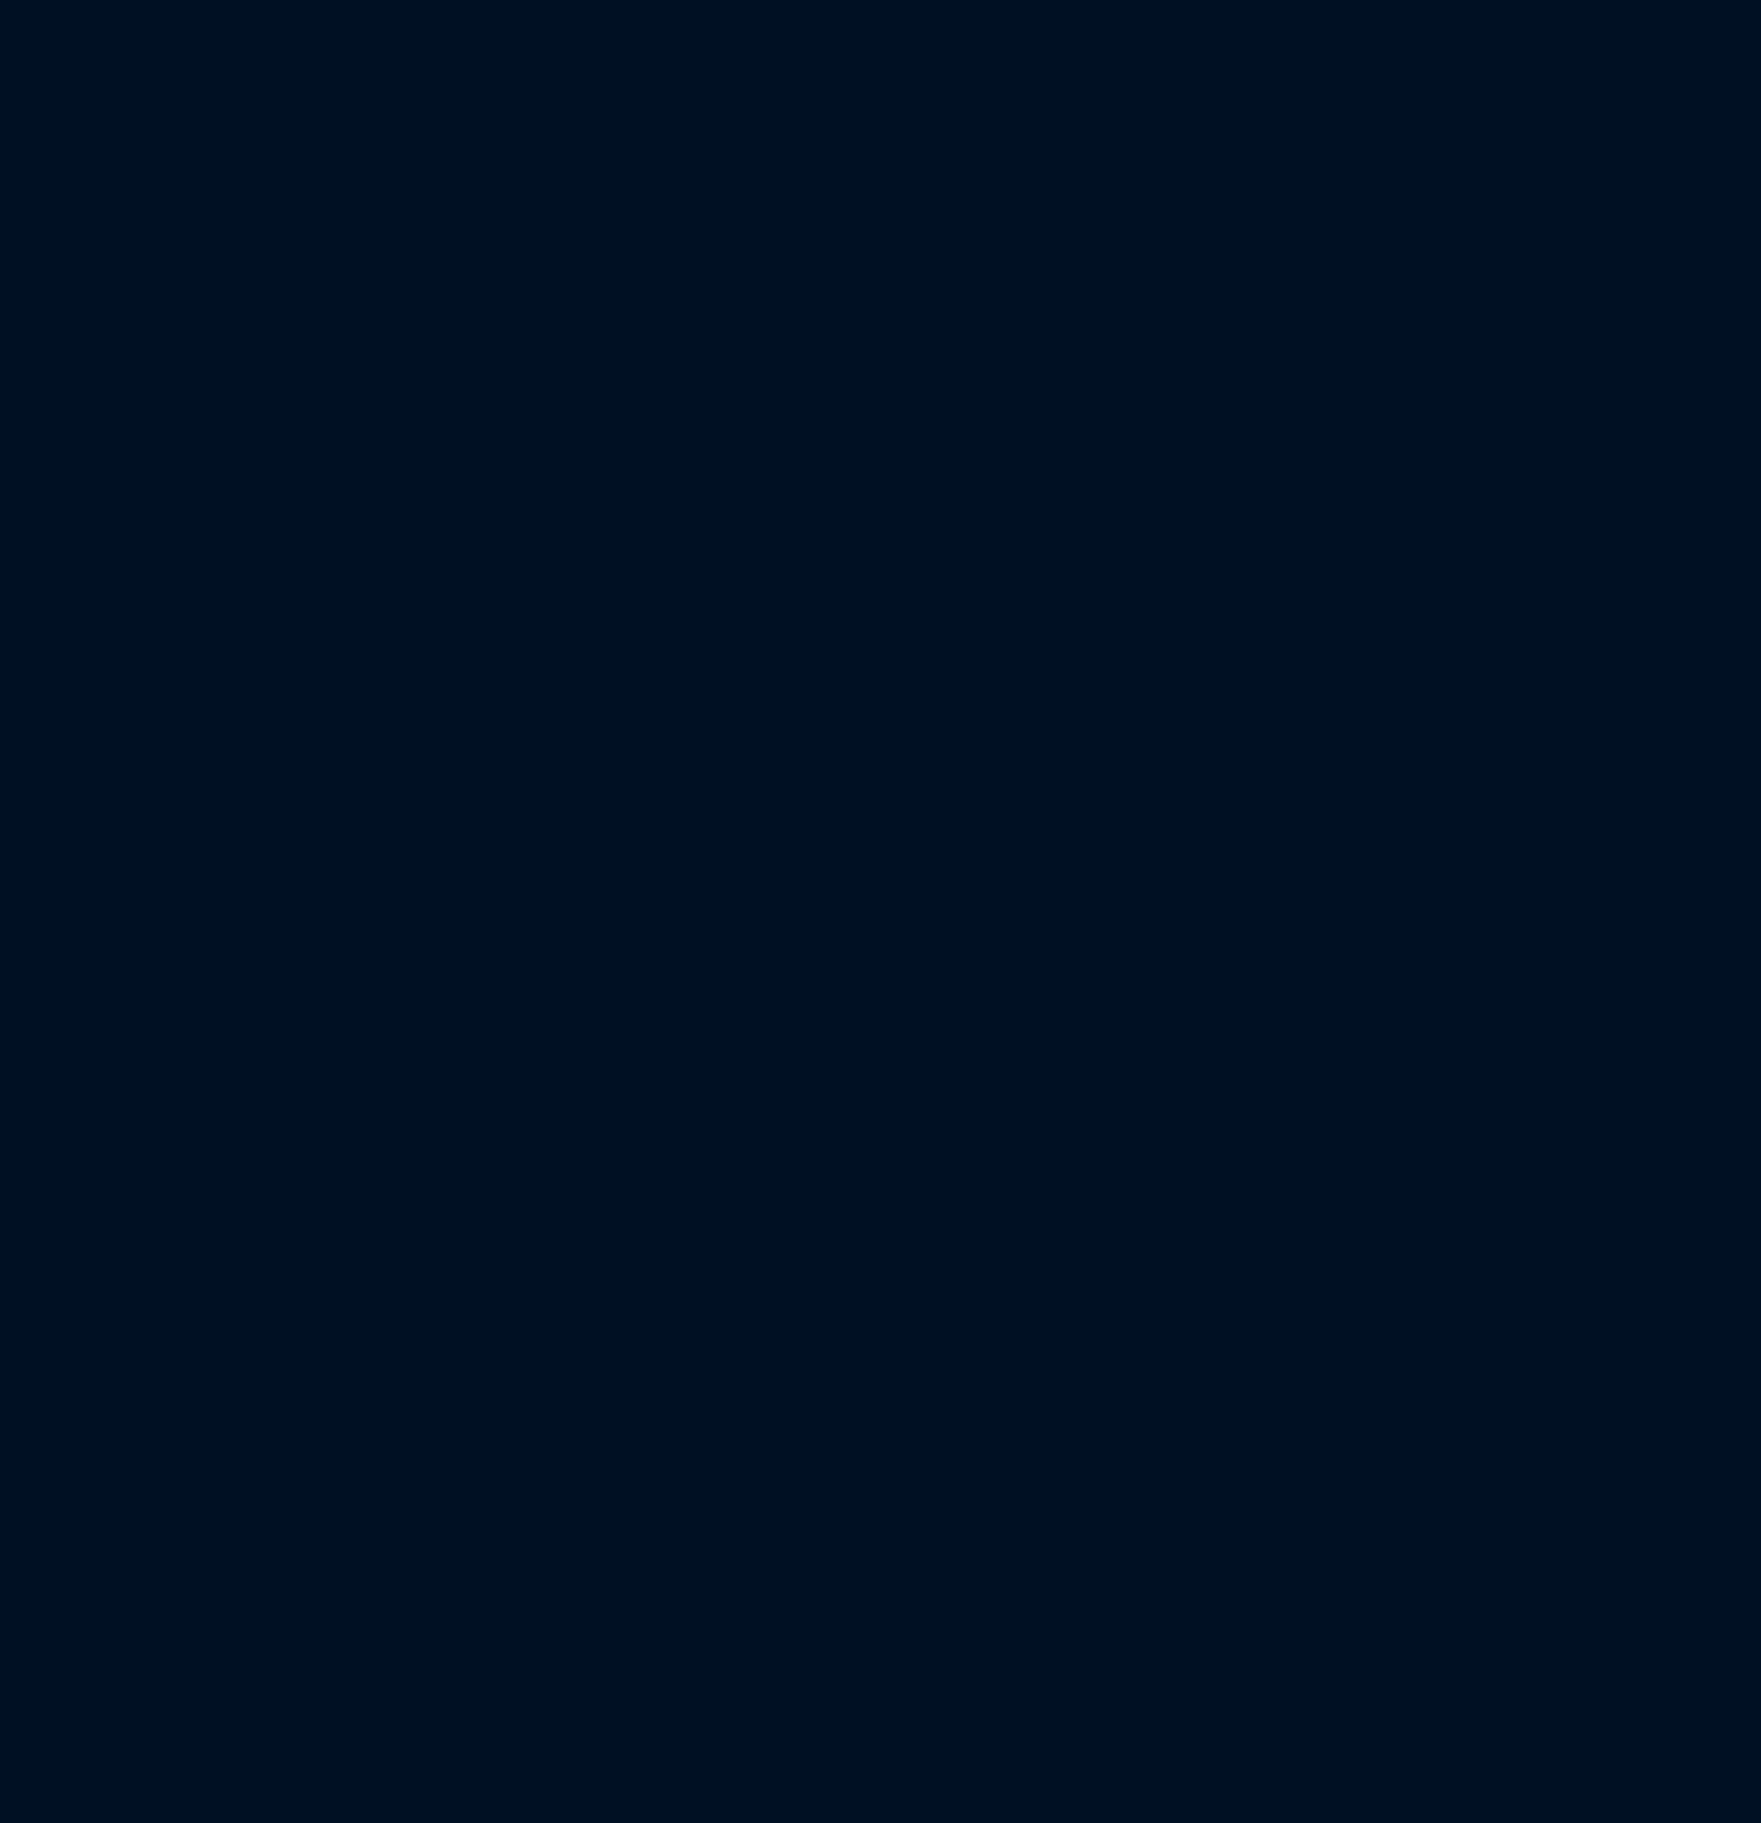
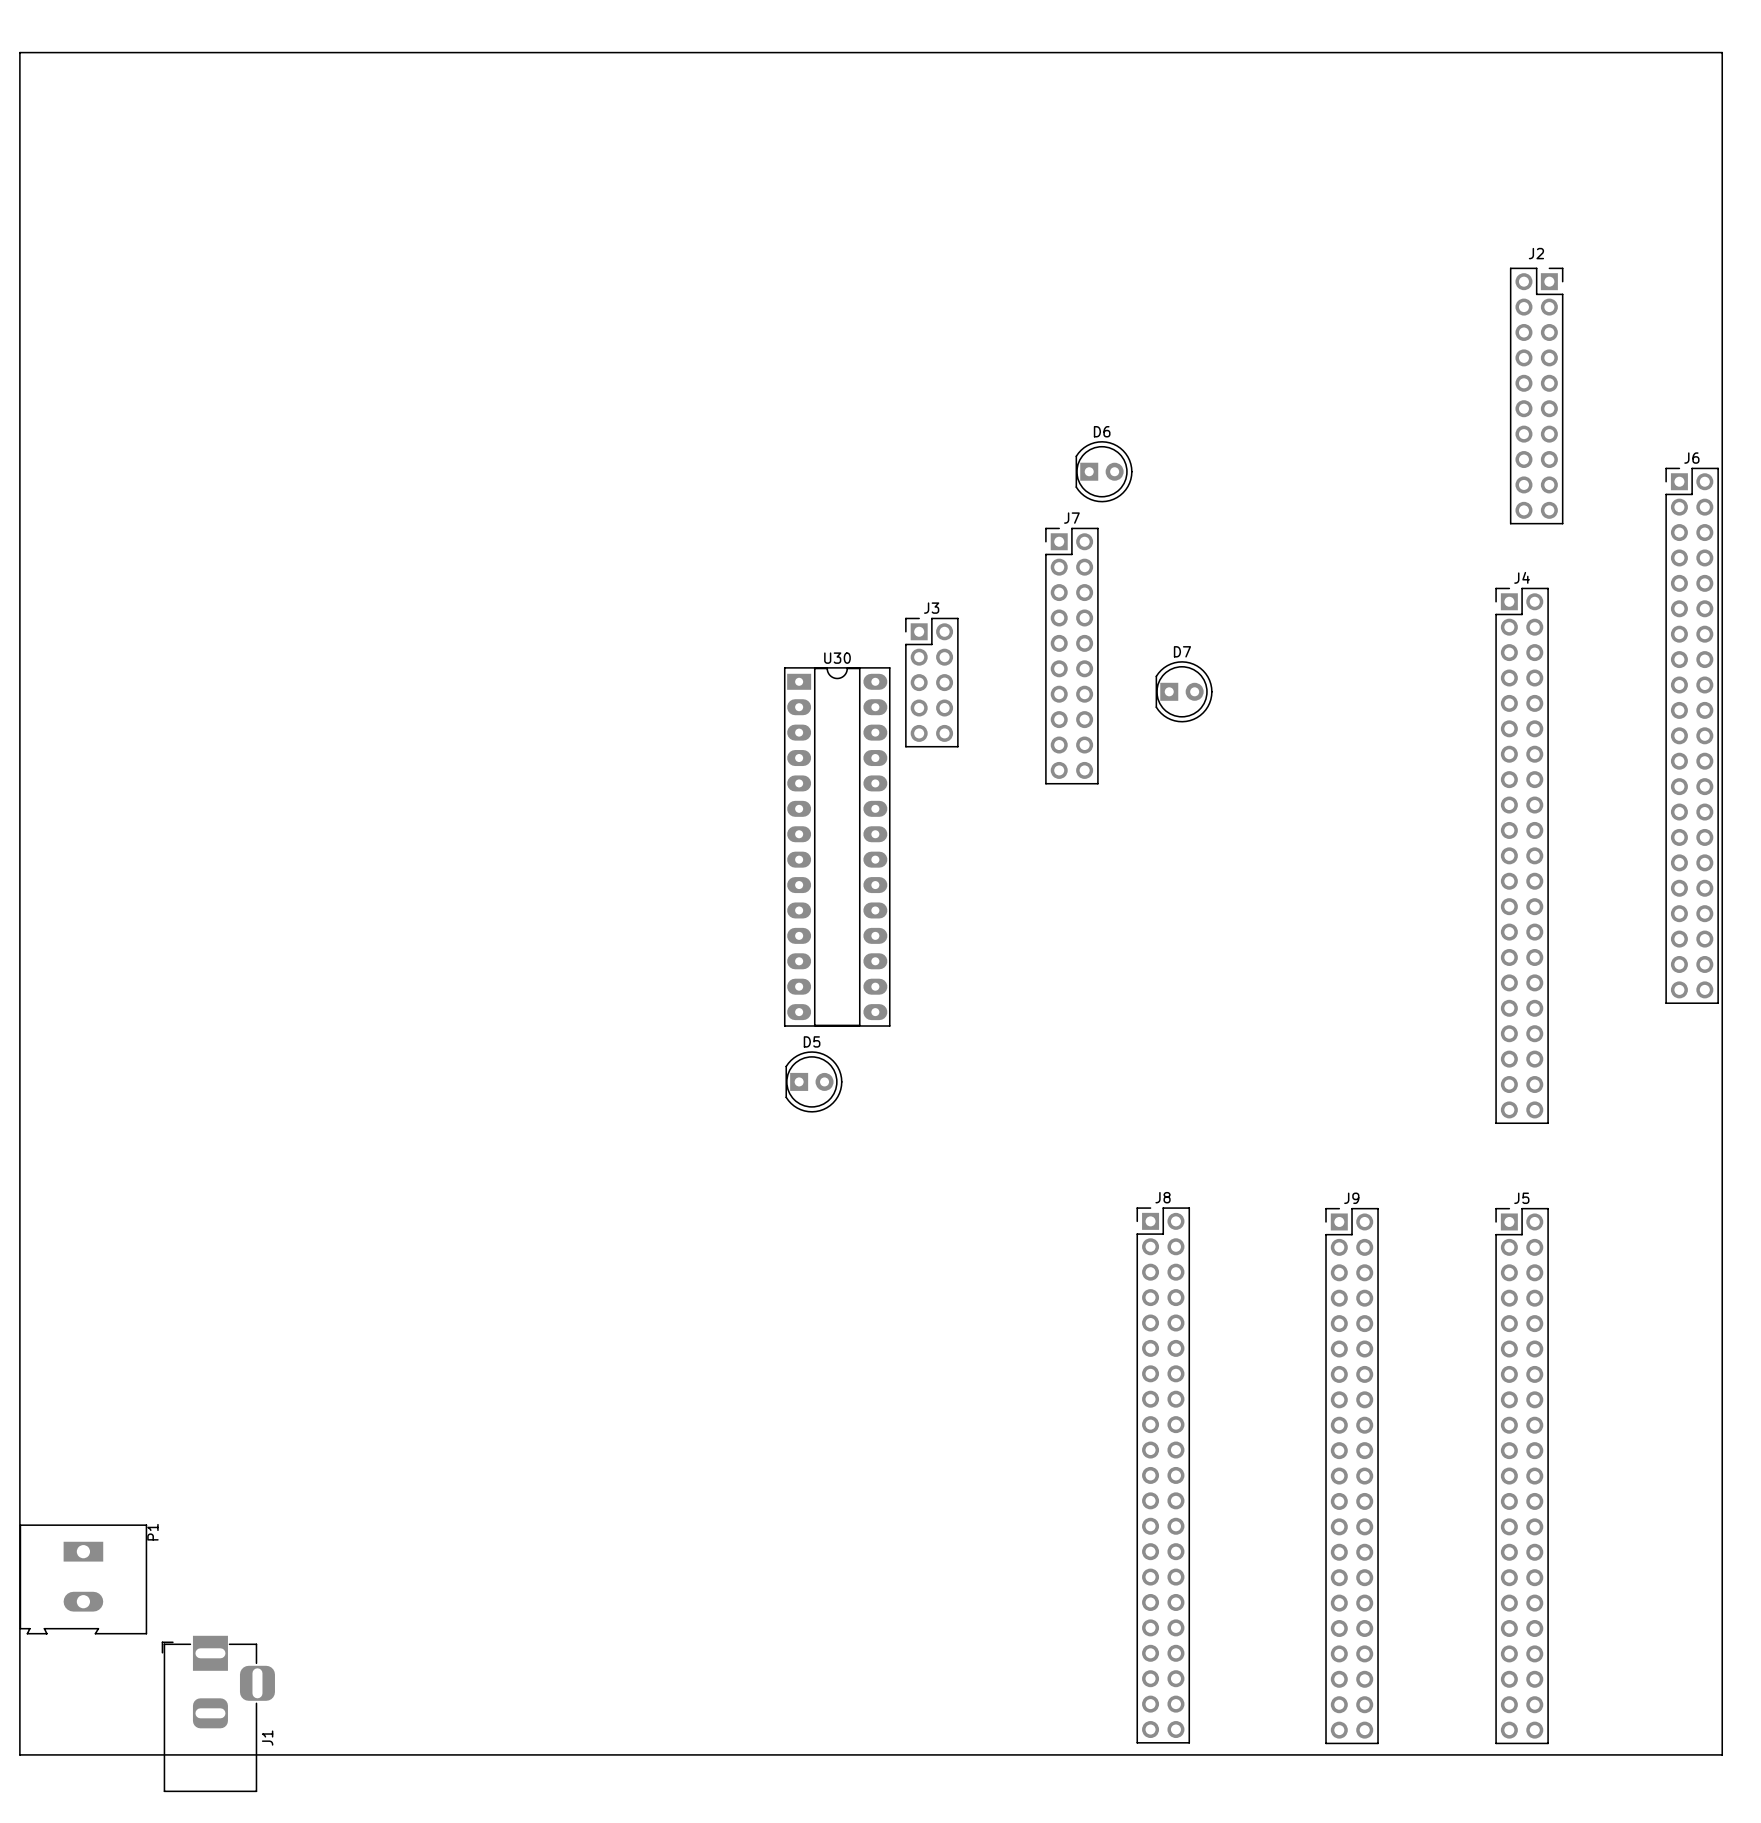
board edge: none -> (19, 52) (19, 1754) (1722, 1754) (1722, 52) (19, 52)
J2: none -> (1536, 396)
D6: none -> (1104, 471)
J7: none -> (1071, 656)
J3: none -> (931, 682)
D7: none -> (1184, 691)
J6: none -> (1692, 735)
U30: none -> (837, 846)
J4: none -> (1522, 855)
D5: none -> (813, 1081)
J8: none -> (1163, 1475)
J9: none -> (1352, 1476)
J5: none -> (1522, 1476)
P1: none -> (83, 1579)
J1: none -> (218, 1713)

